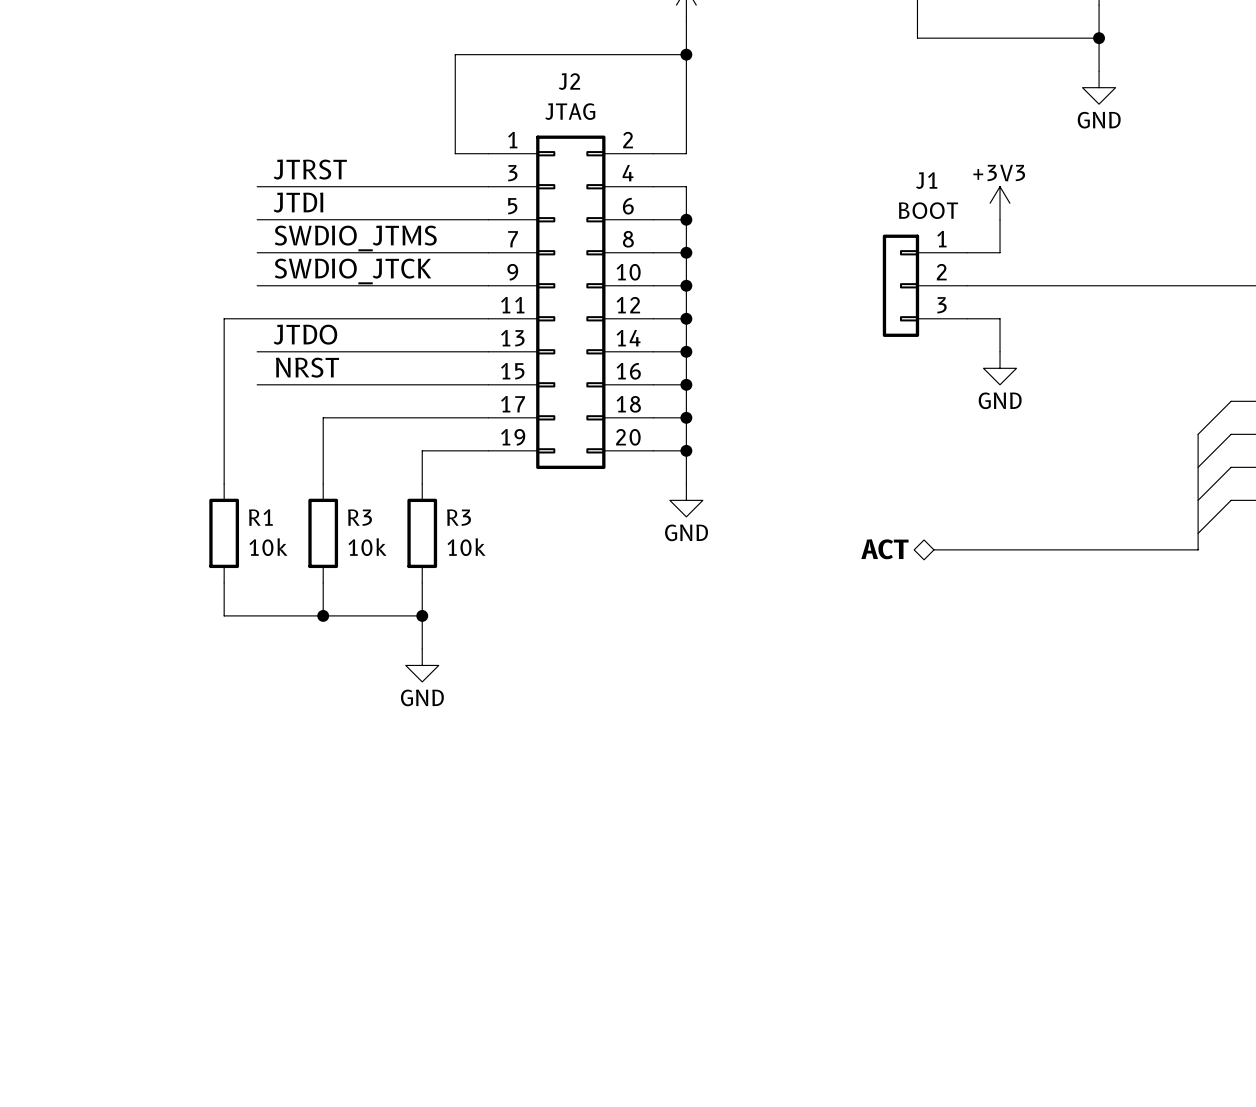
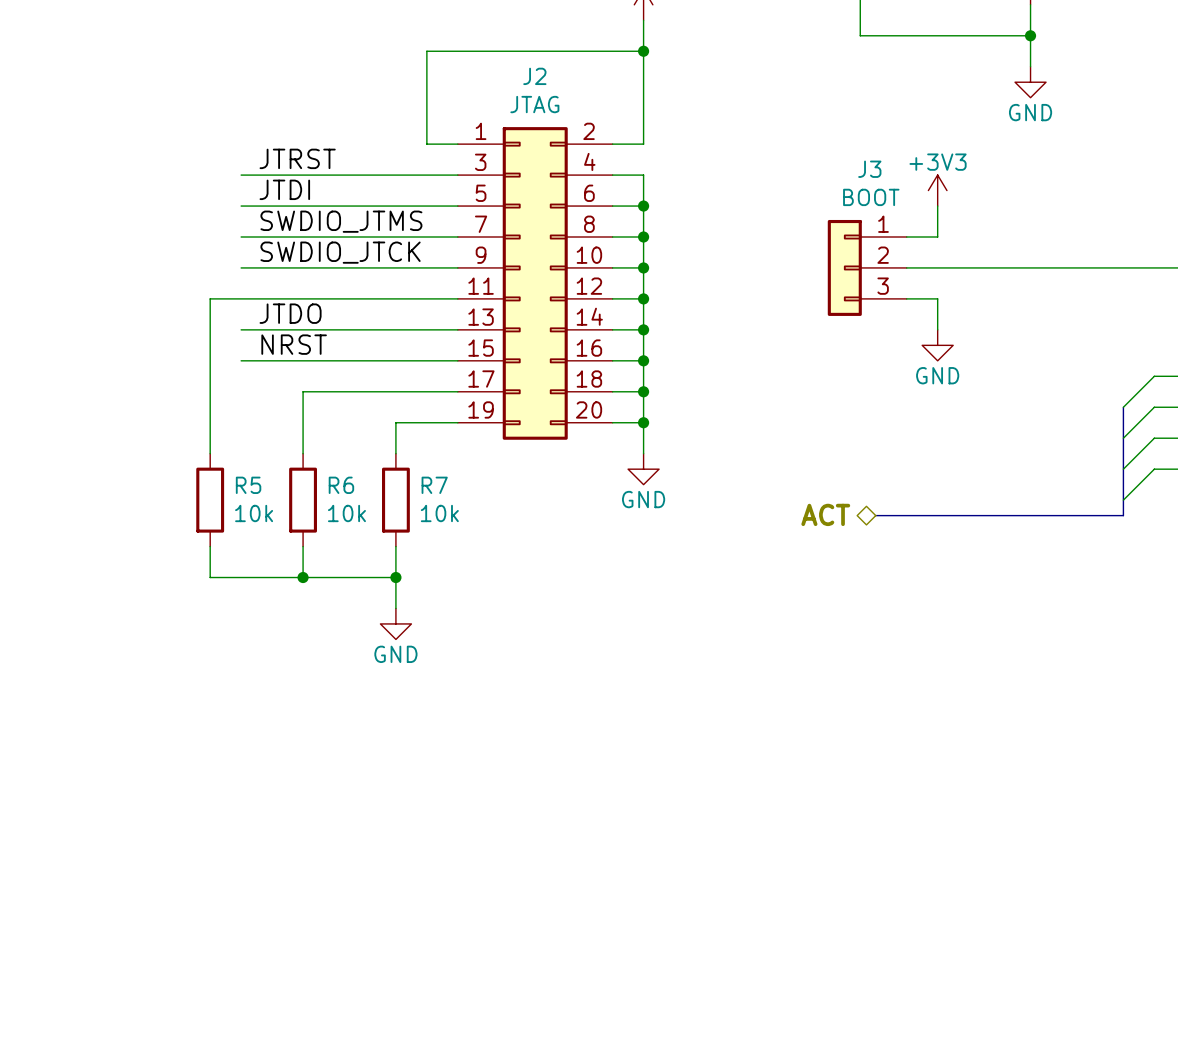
J1 name: J1 (926, 180) -> J3 (869, 169)
R1 name: R1 (260, 517) -> R5 (248, 485)
R3 name: R3 (359, 517) -> R6 (341, 485)
R3 name: R3 (459, 517) -> R7 (434, 485)

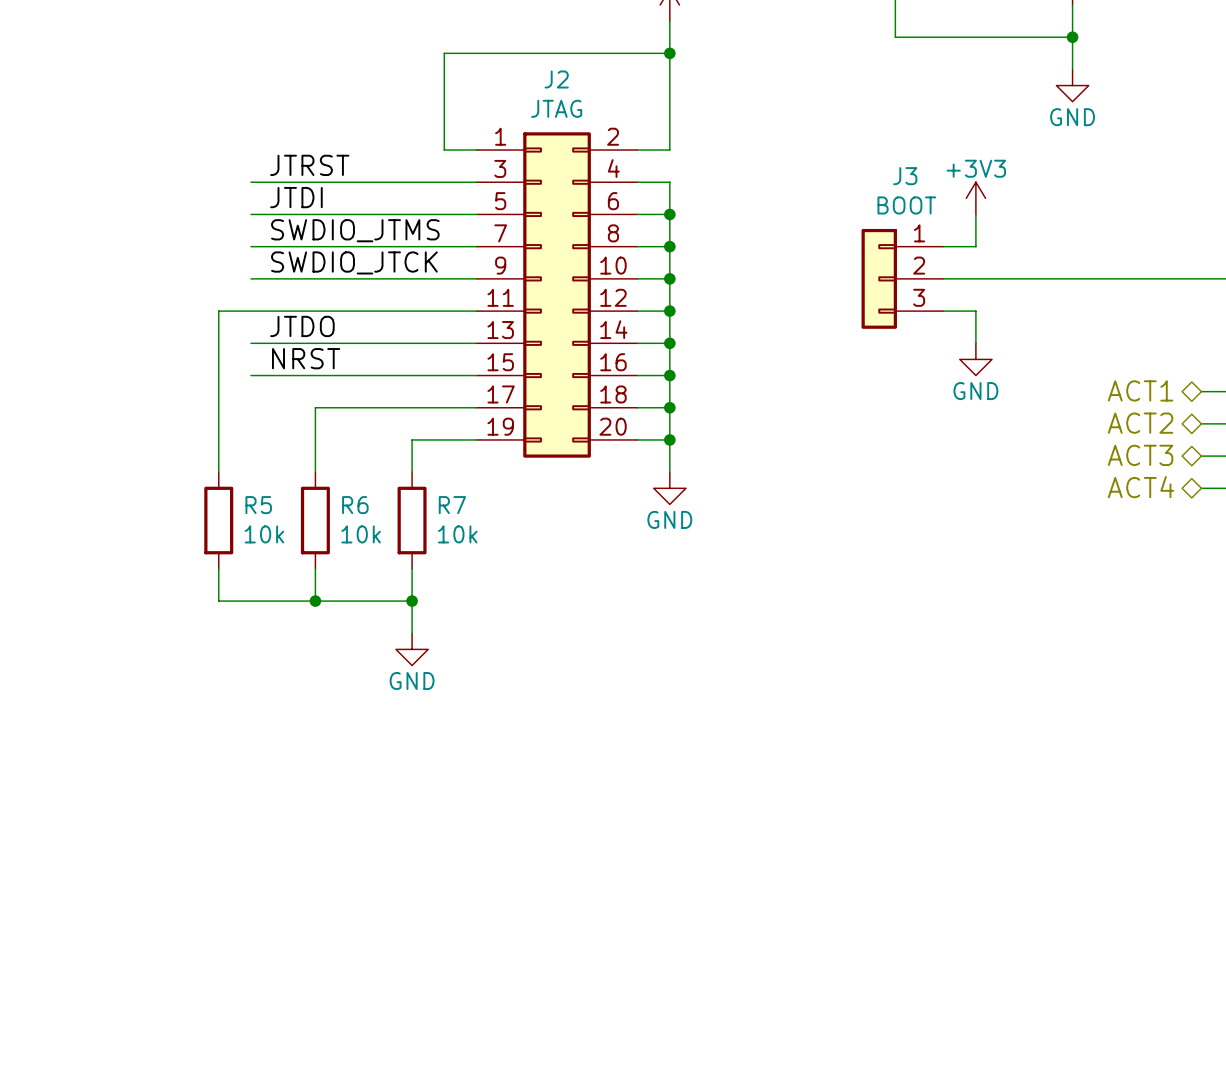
hierarchical label: none -> ACT1 (1140, 390)
wire: (1154, 376) (1123, 407) -> none
hierarchical label: none -> ACT2 (1140, 423)
bus: (1123, 407) (1123, 515) (875, 515) -> none
wire: (1154, 407) (1123, 438) -> none
hierarchical label: none -> ACT3 (1140, 455)
wire: (1154, 438) (1123, 469) -> none
hierarchical label: none -> ACT4 (1141, 487)
wire: (1154, 469) (1123, 500) -> none
hierarchical label: ACT (825, 514) -> none

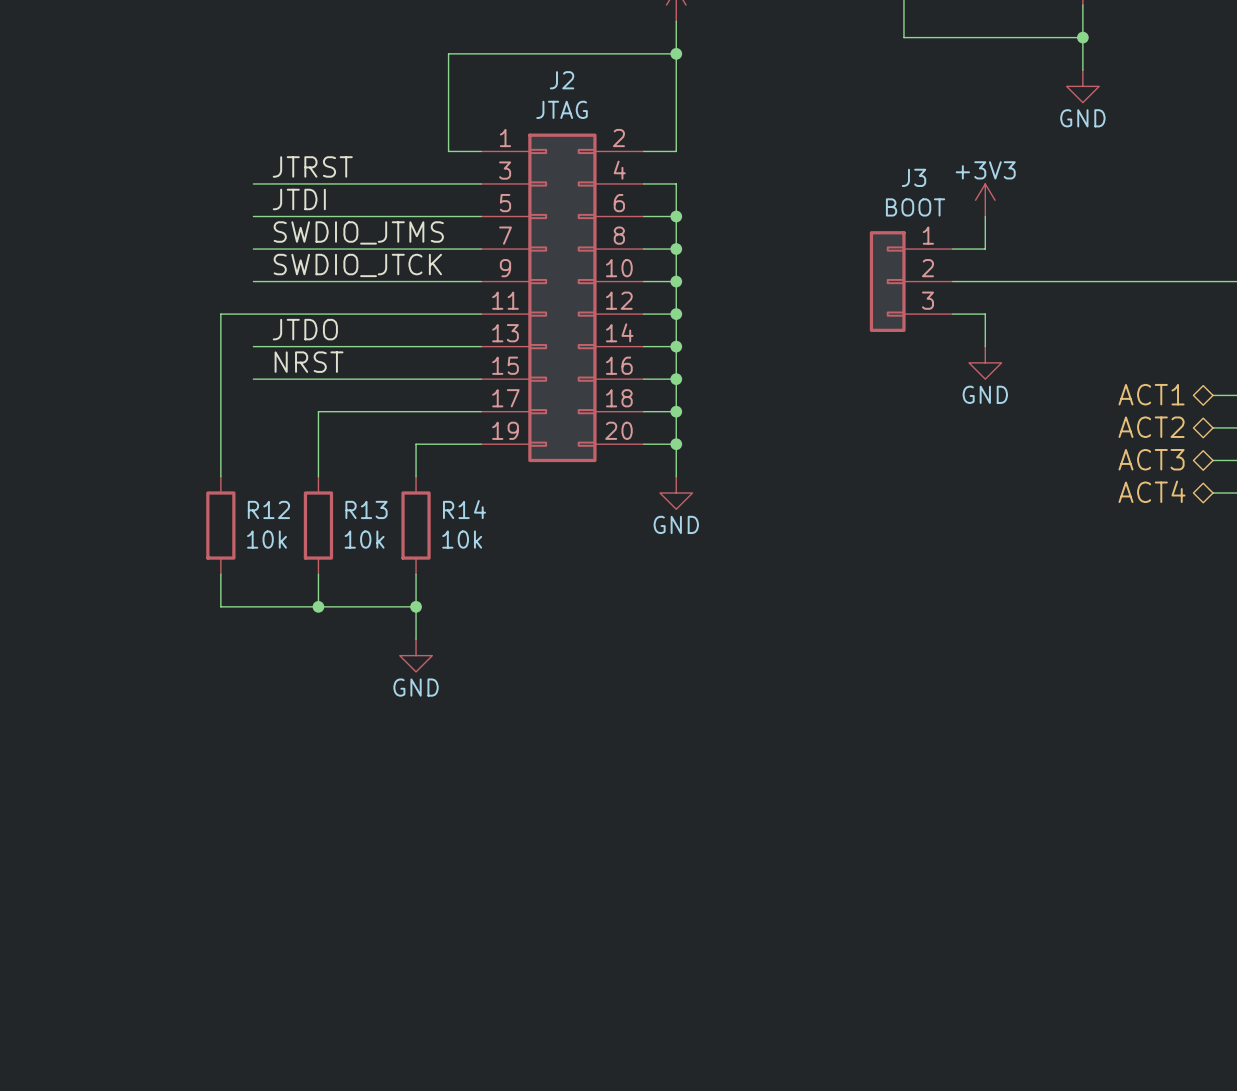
R5 name: R5 (258, 505) -> R12 (268, 509)
R6 name: R6 (355, 505) -> R13 (366, 509)
R7 name: R7 (452, 505) -> R14 (464, 509)

